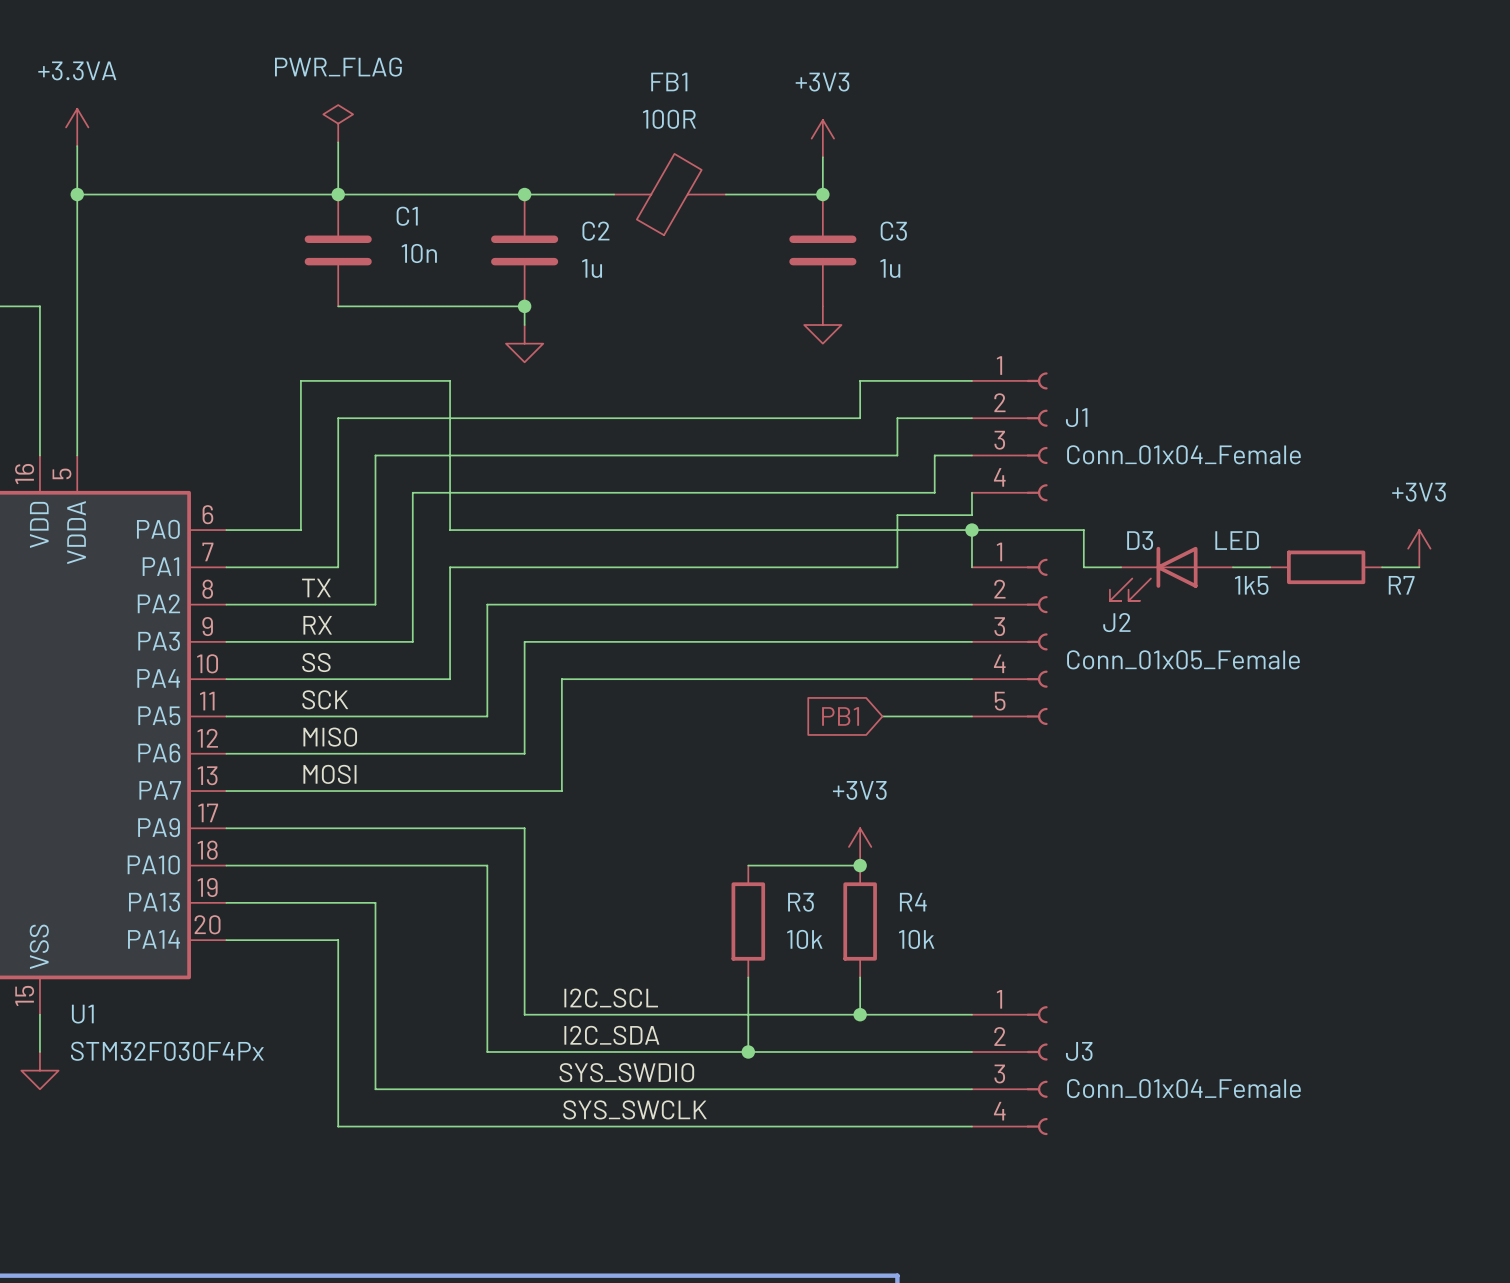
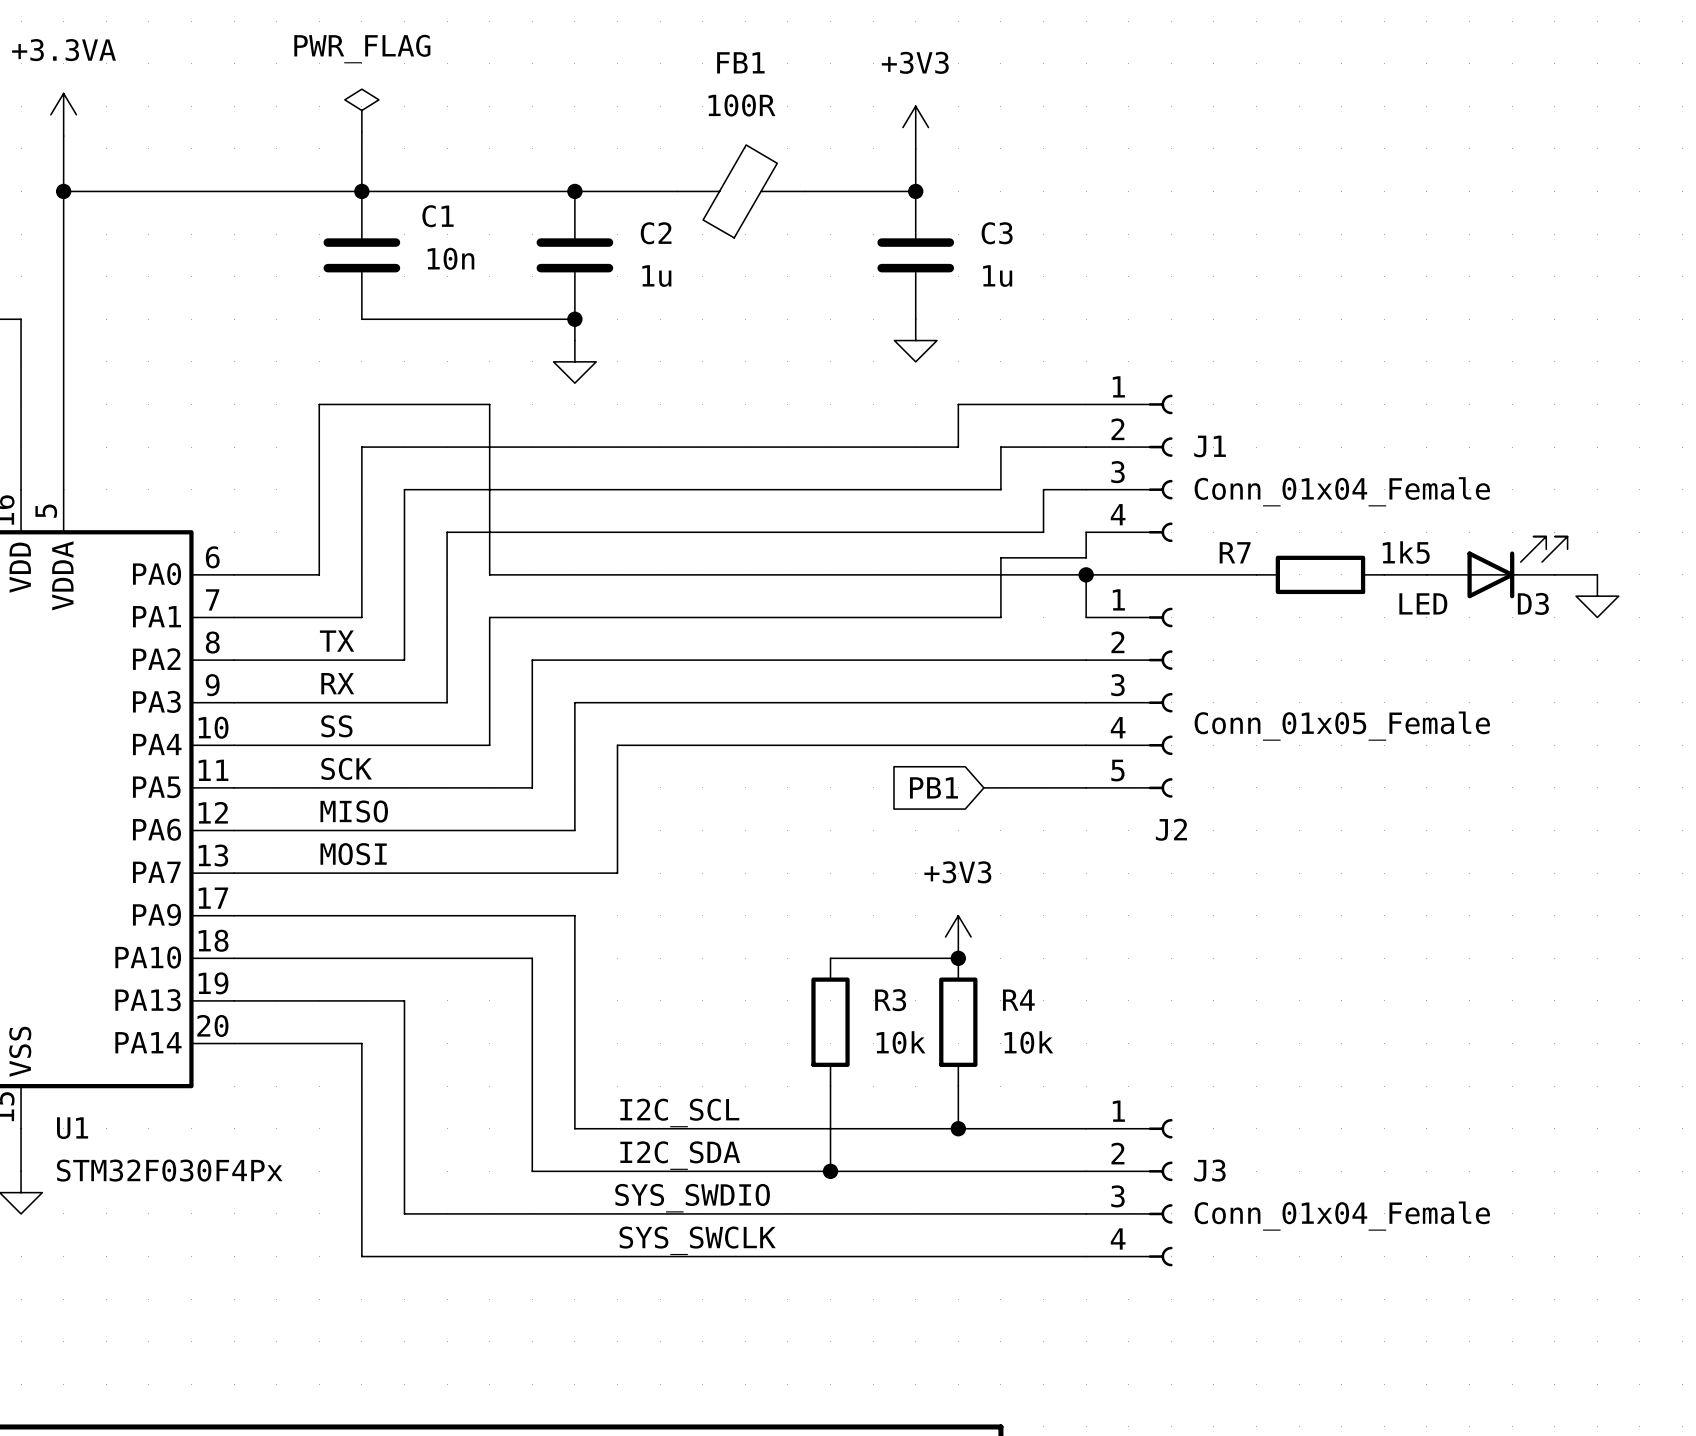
power symbol text: +3V3 (1419, 492) -> none
wire: (1083, 530) (1083, 567) (1121, 567) -> (1213, 574) (1256, 574)
power symbol shape: [1408, 530, 1431, 568] -> [1576, 574, 1619, 618]
wire: (1232, 567) (1270, 567) -> (1384, 574) (1426, 574)
R7 position: (1326, 567) -> (1320, 574)
wire: (1382, 567) (1419, 567) -> (1554, 574) (1597, 574)
D3 rotation: 0° (1153, 573) -> 180° (1517, 567)
D3 position: (1171, 573) -> (1497, 567)
R7 value position: 1k5 (1251, 585) -> 1k5 (1406, 552)
R7 name position: R7 (1401, 585) -> R7 (1235, 552)
J2 name position: J2 (1116, 622) -> J2 (1171, 829)

